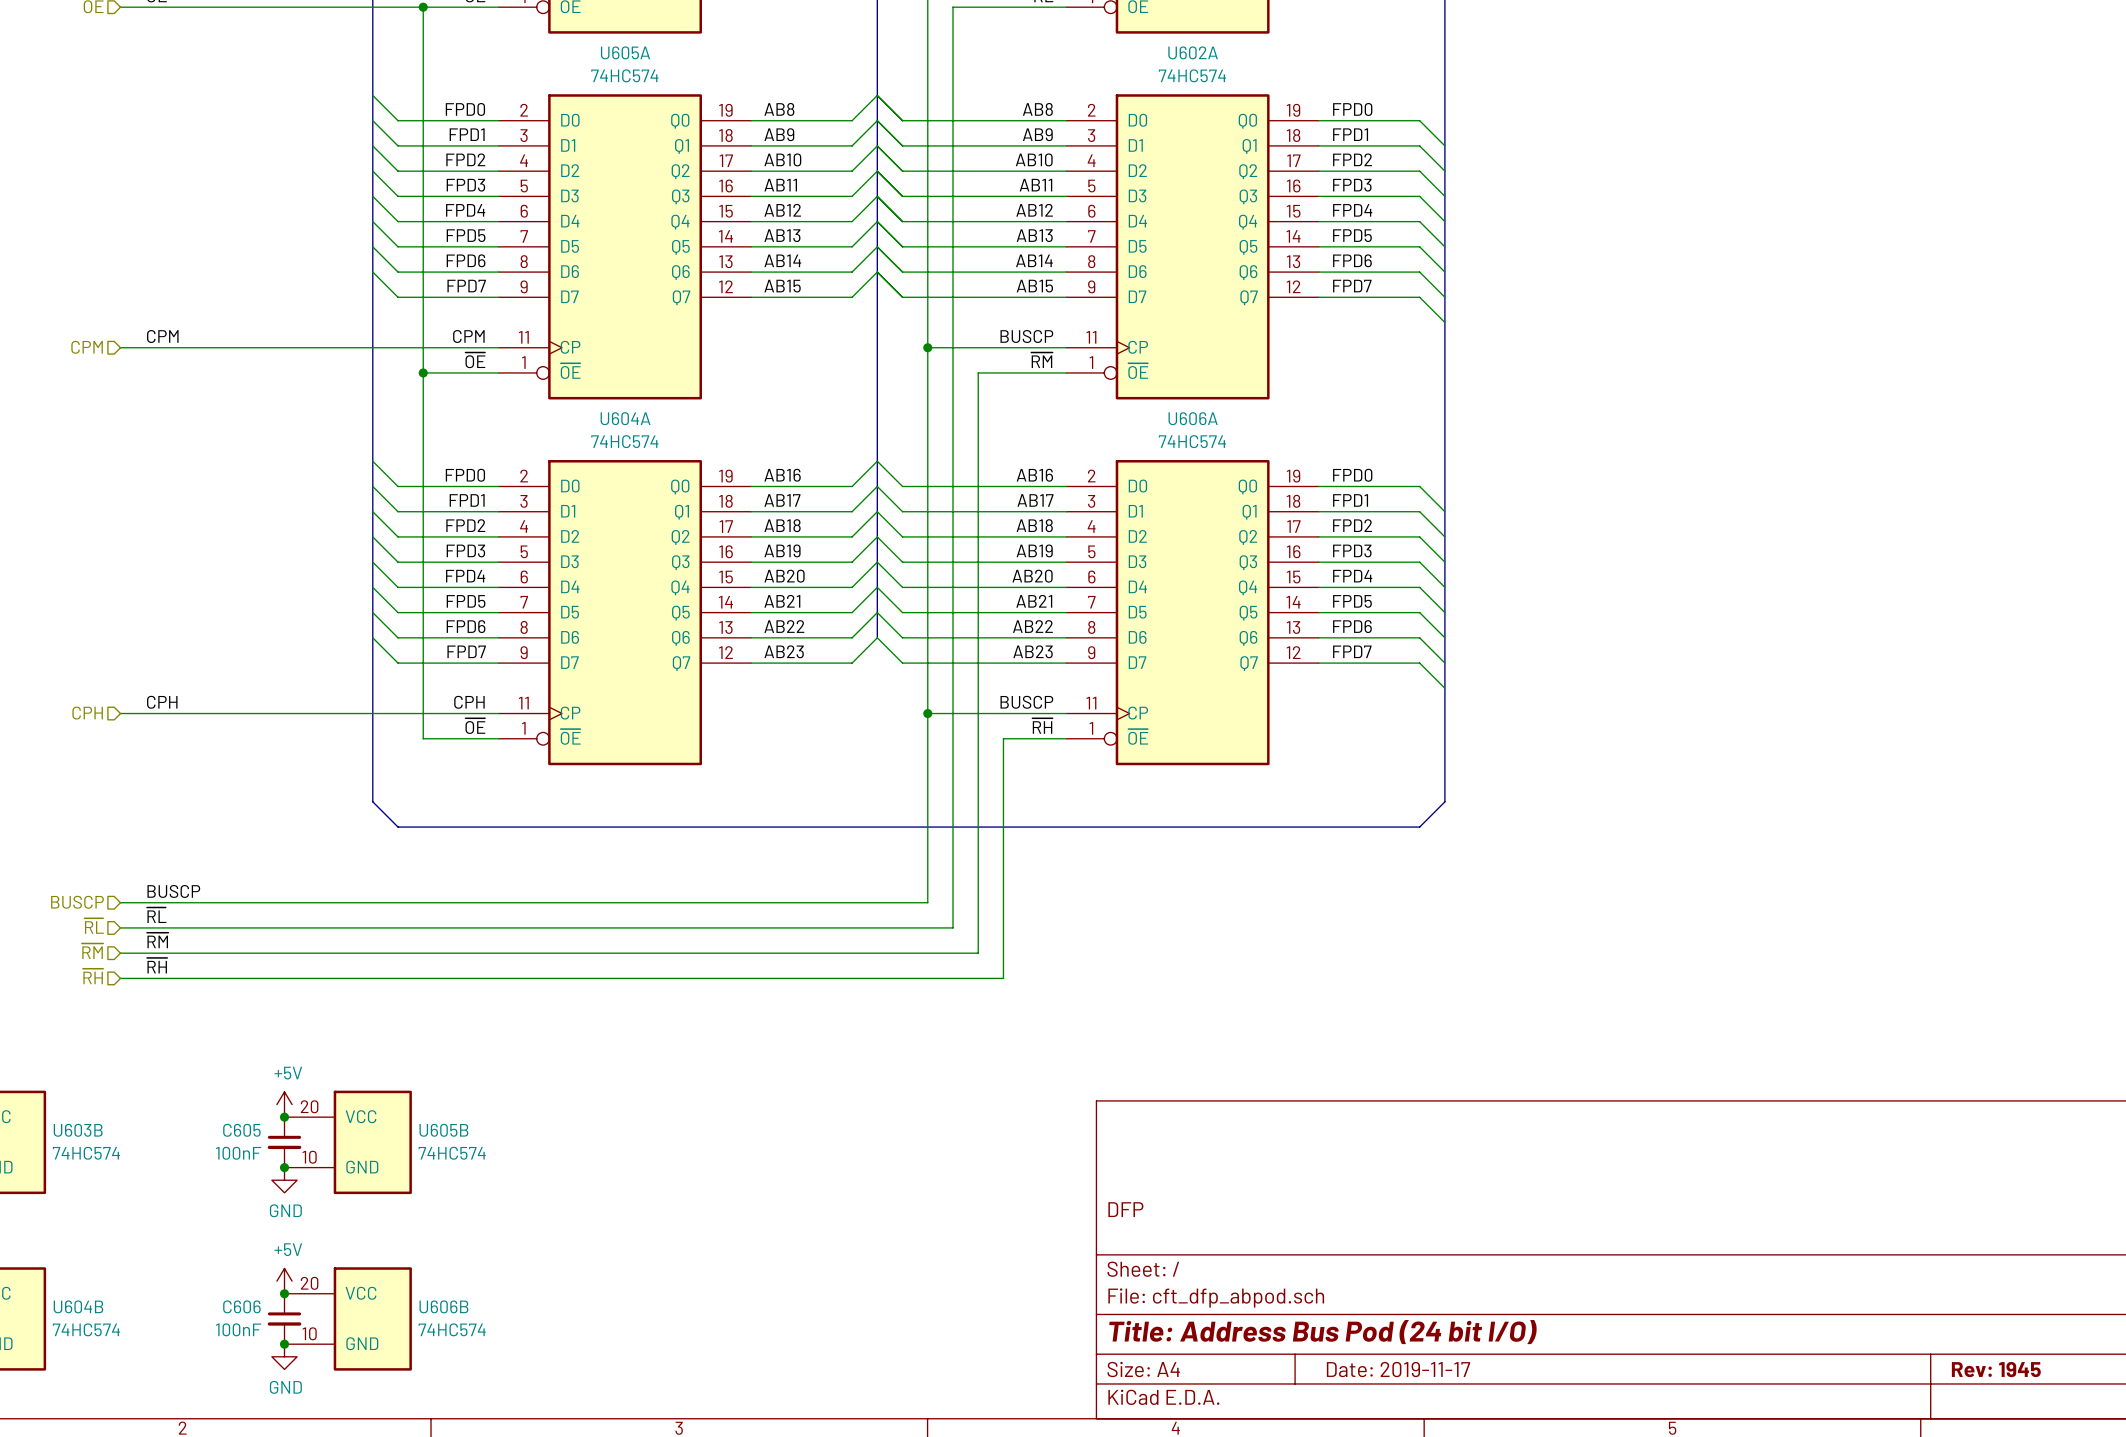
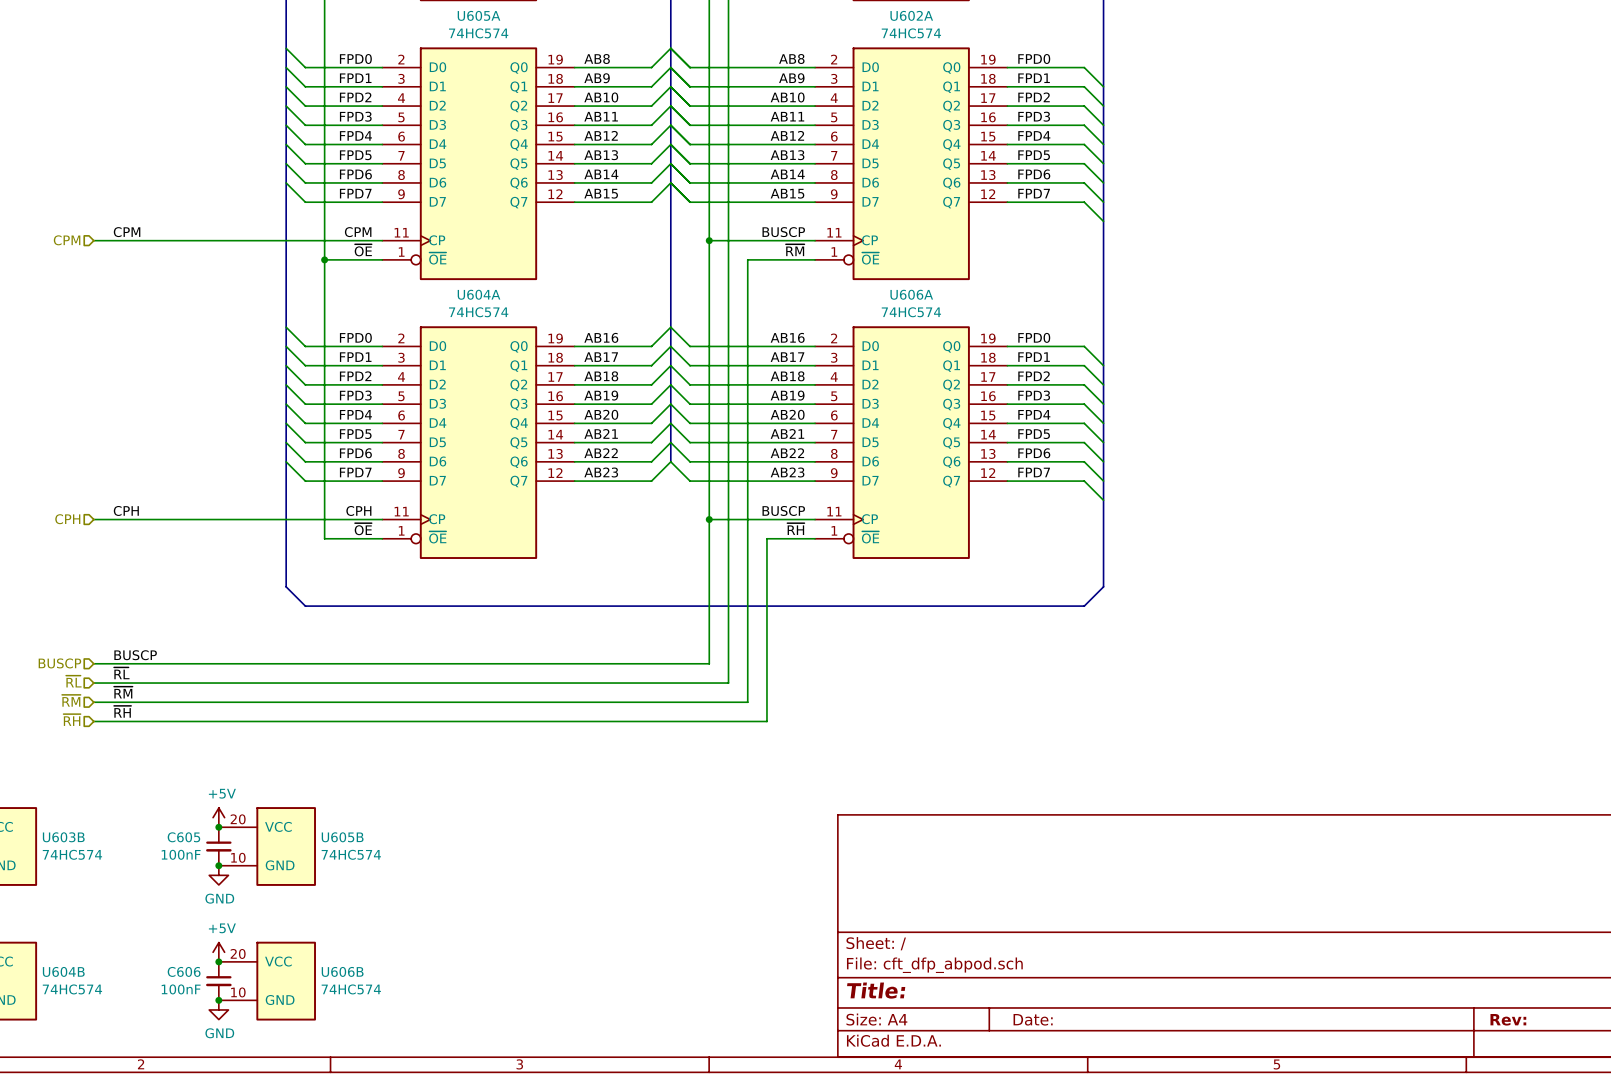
title block: DFP (1125, 1209) -> none
title block: Title: Address Bus Pod (24 bit I/O) (1323, 1332) -> Title: (876, 990)
title block: Date: 2019-11-17 (1398, 1369) -> Date: (1033, 1019)
title block: Rev: 1945 (1996, 1369) -> Rev: (1508, 1019)

